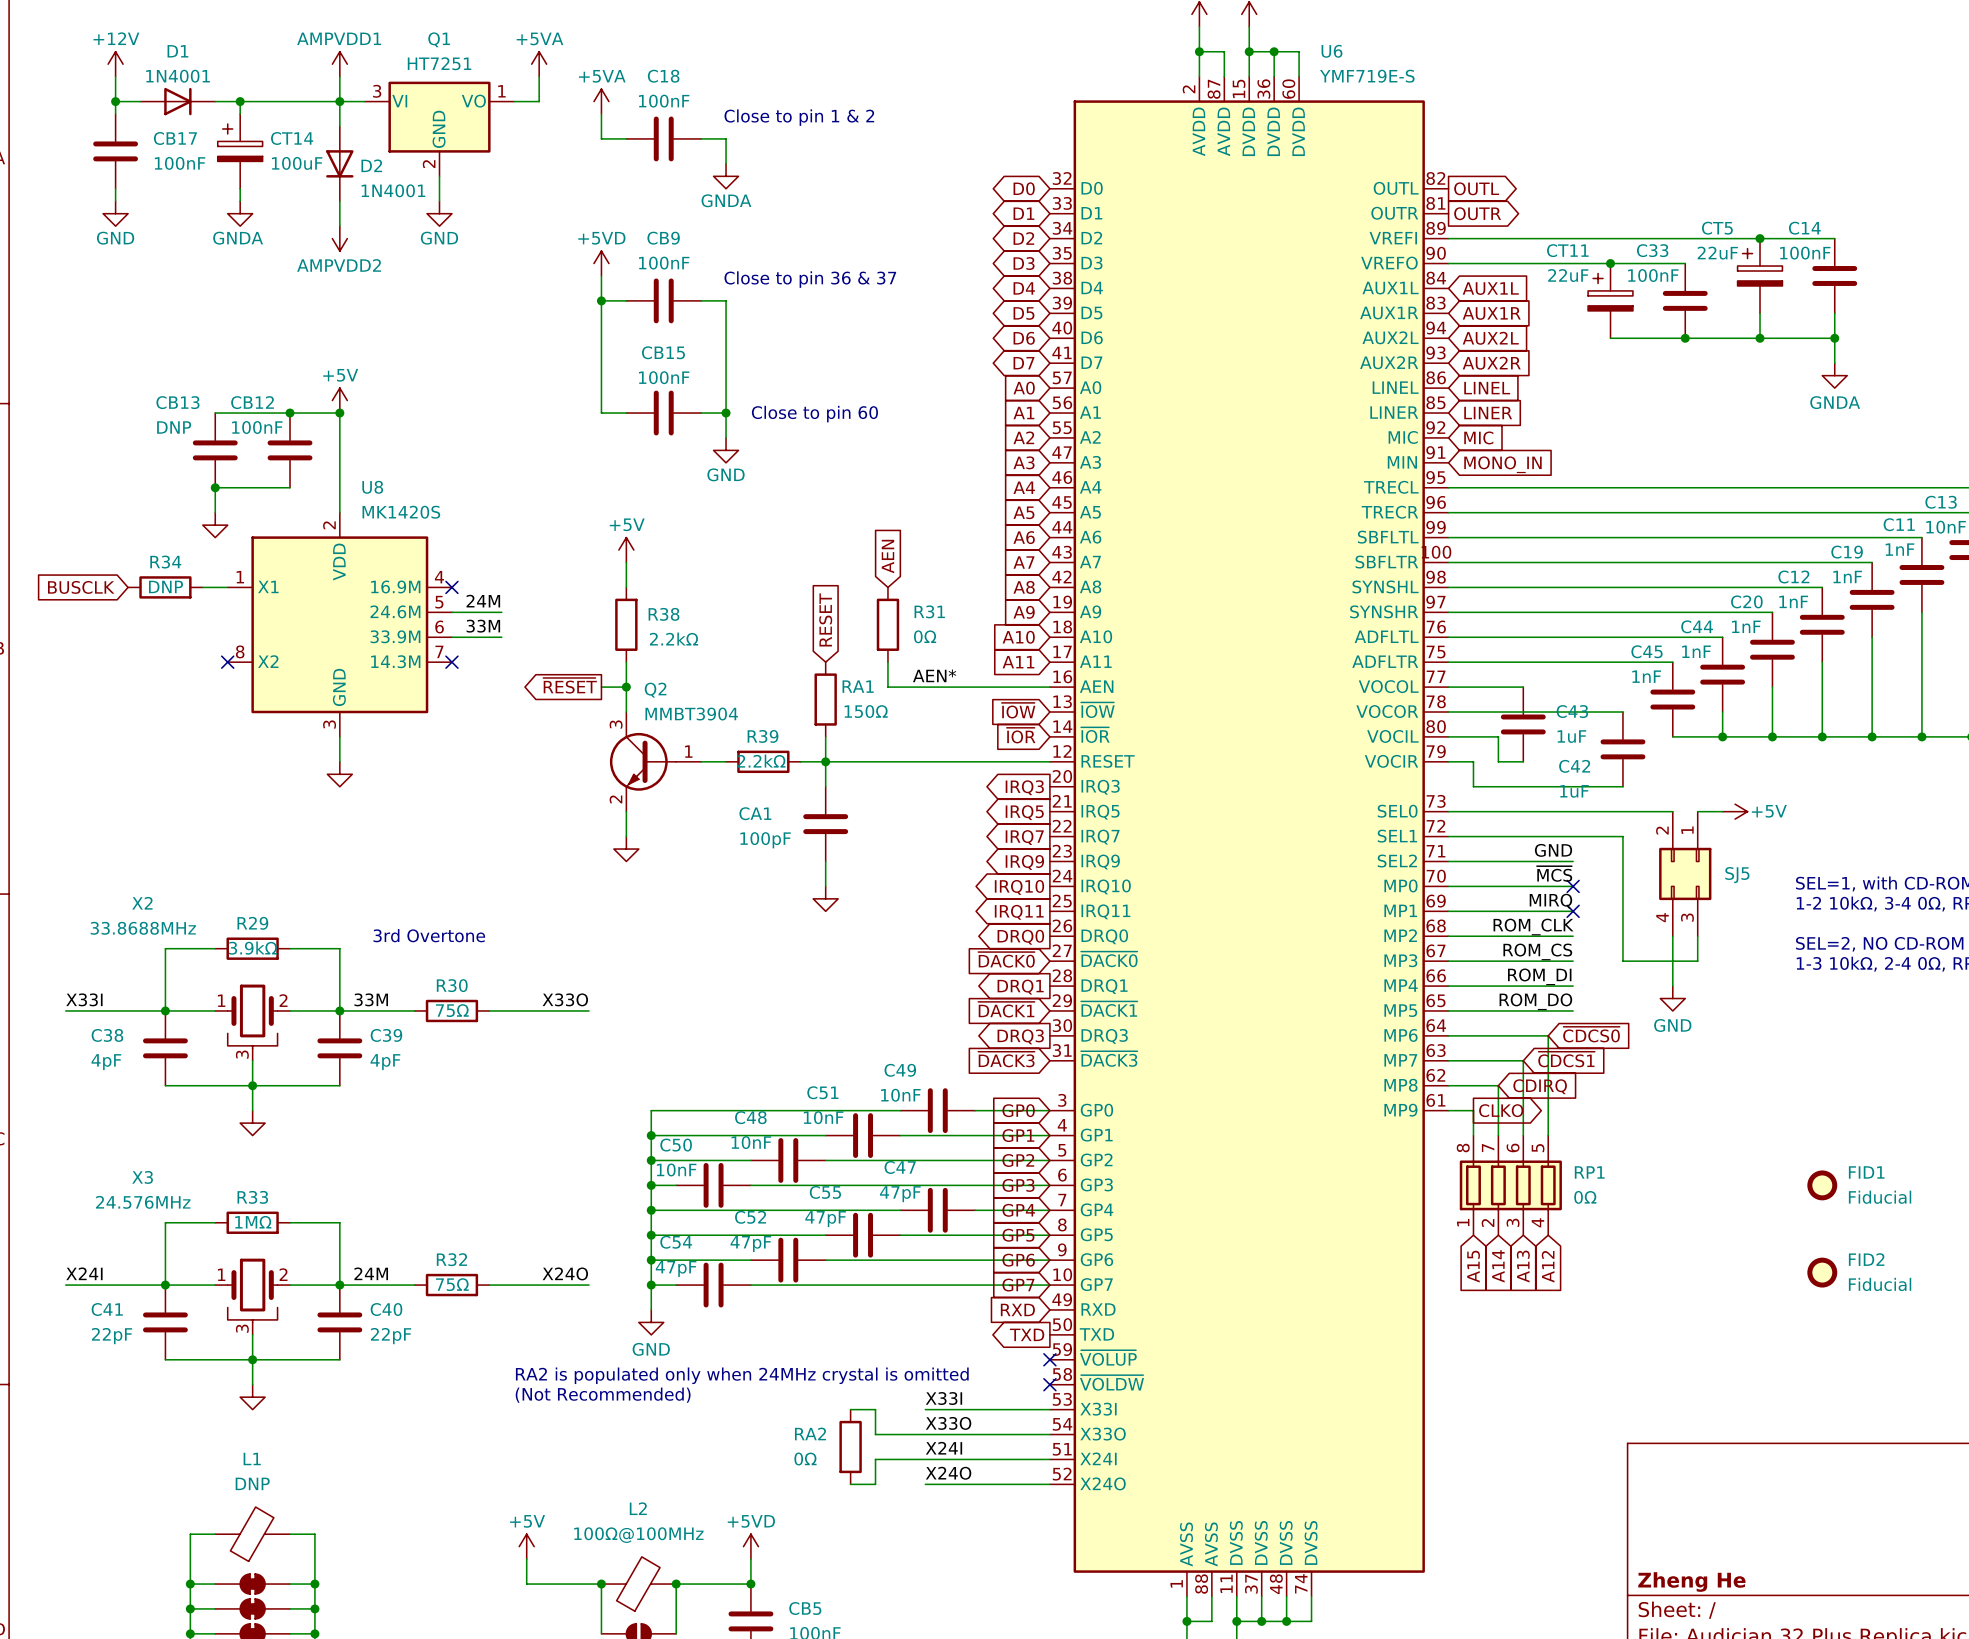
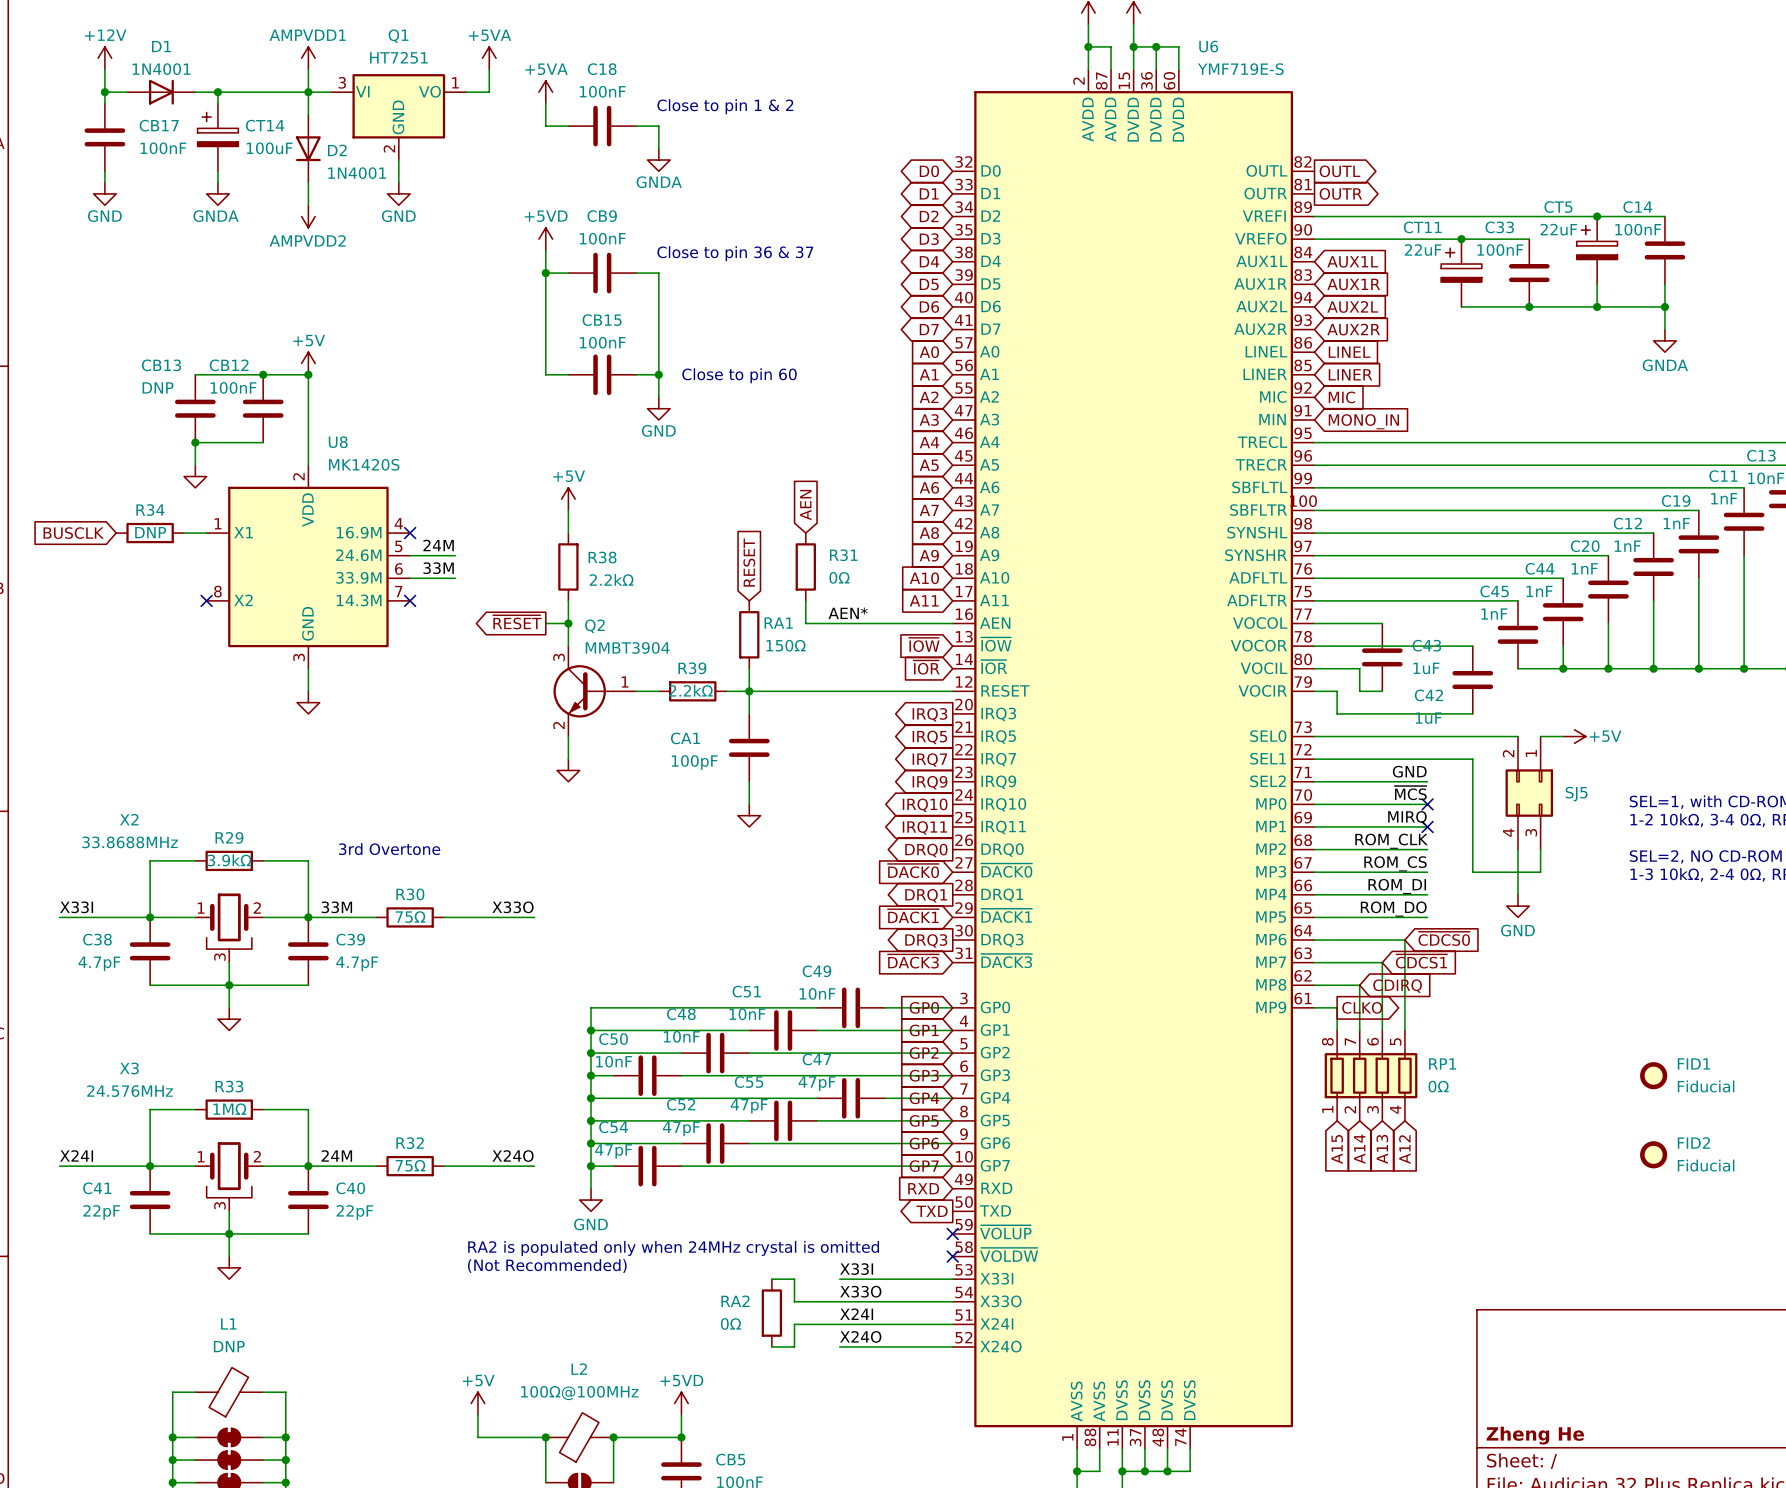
C38 value: 4pF (106, 1062) -> 4.7pF (99, 963)
C39 value: 4pF (385, 1062) -> 4.7pF (357, 963)

